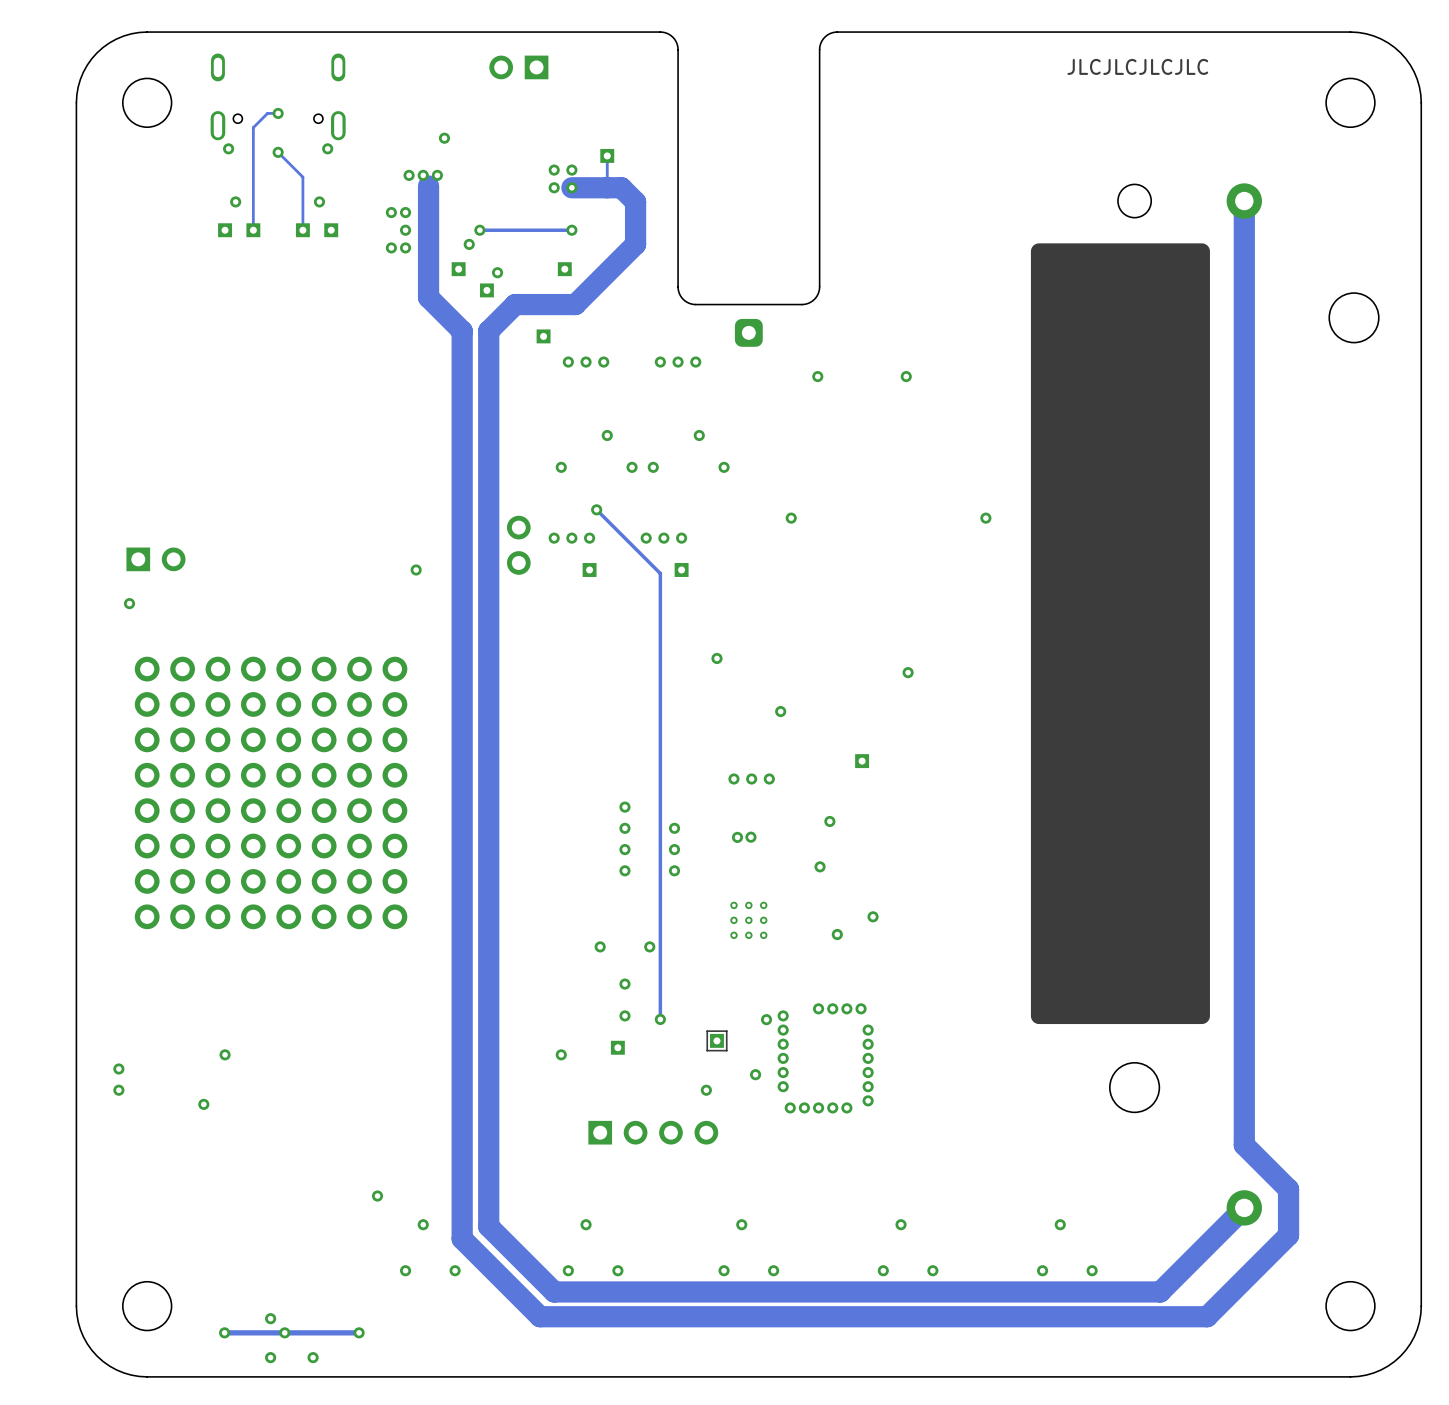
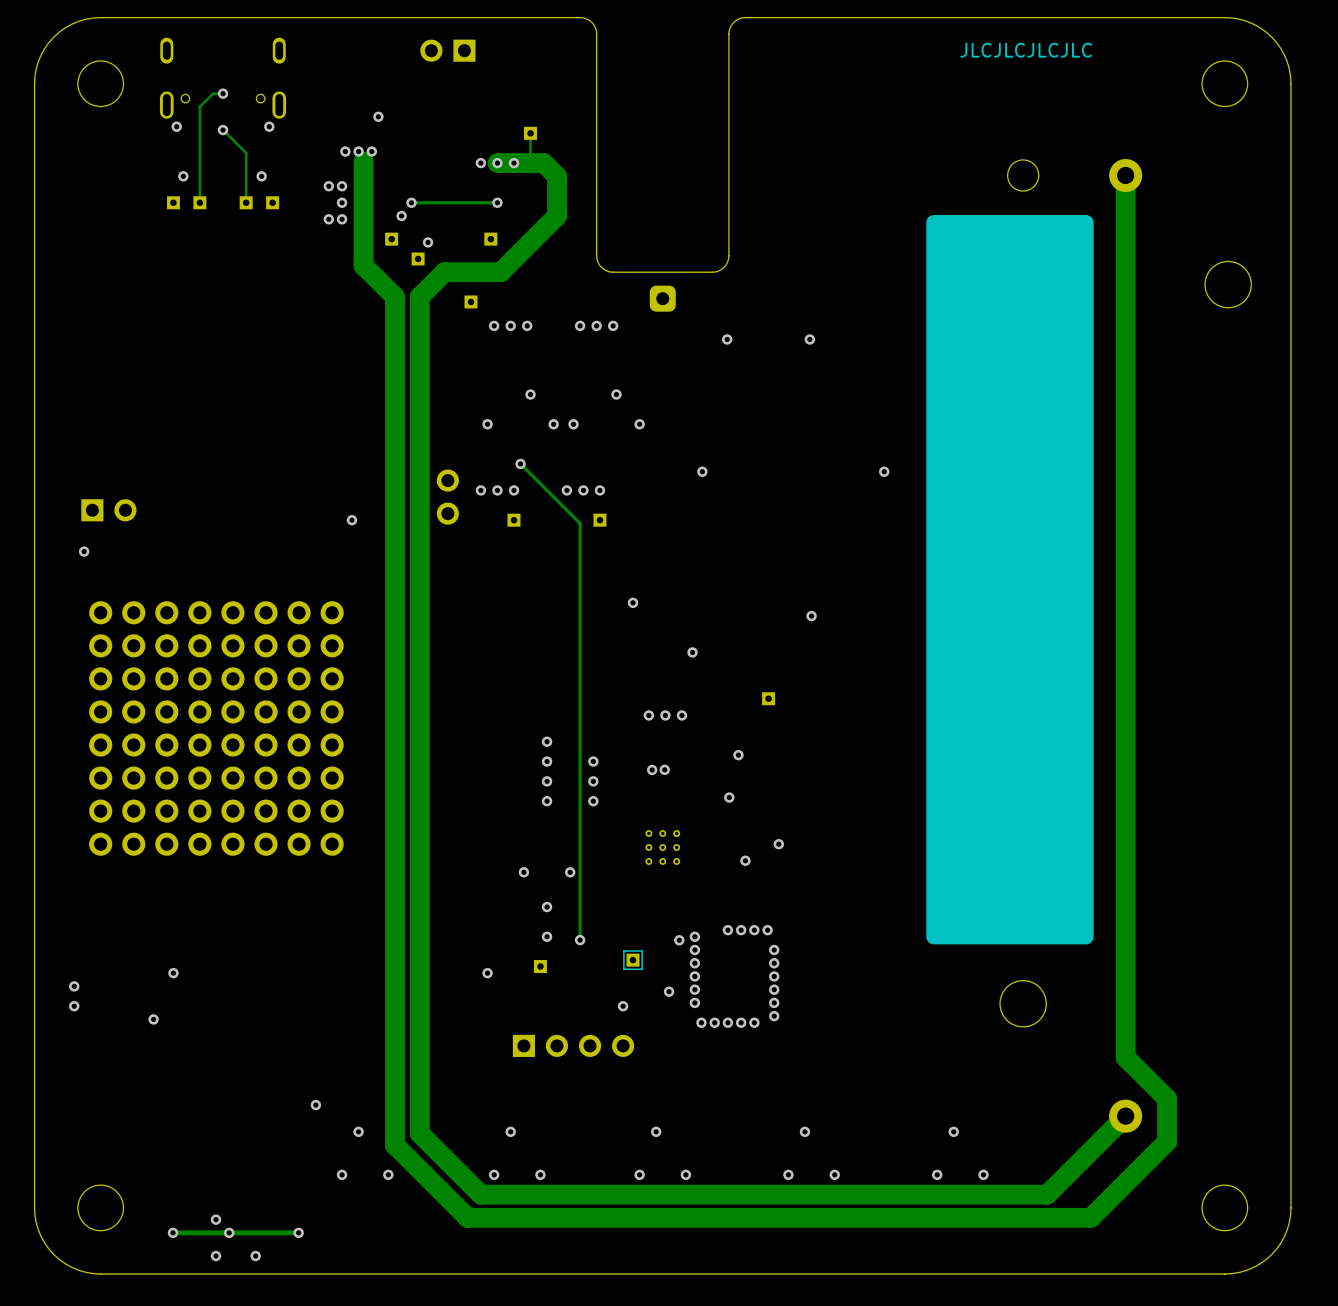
via: (554, 170) -> none
via: (571, 170) -> none
via: none -> (513, 163)

